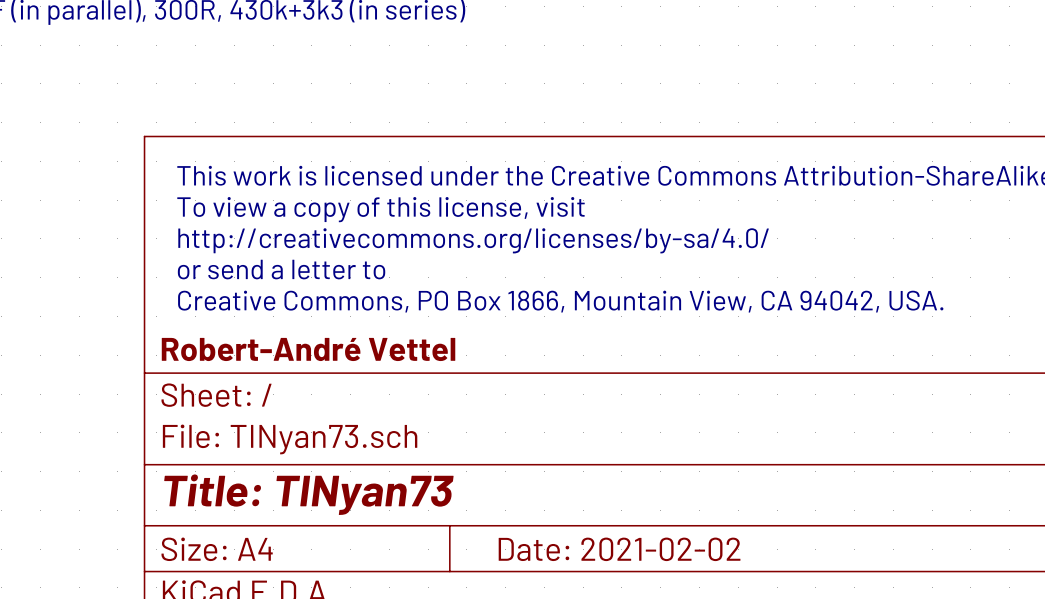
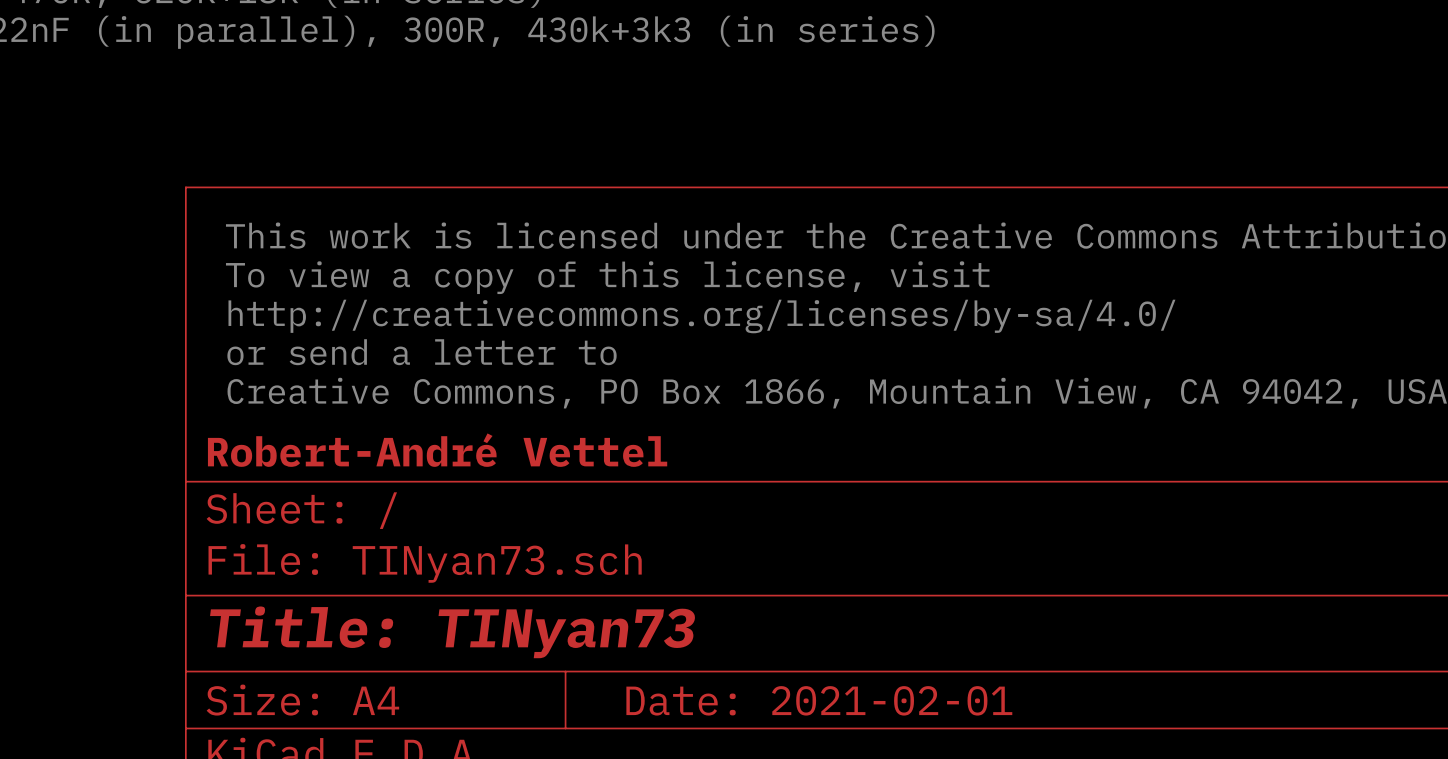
title block: Date: 2021-02-02 (619, 549) -> Date: 2021-02-01 (819, 700)

